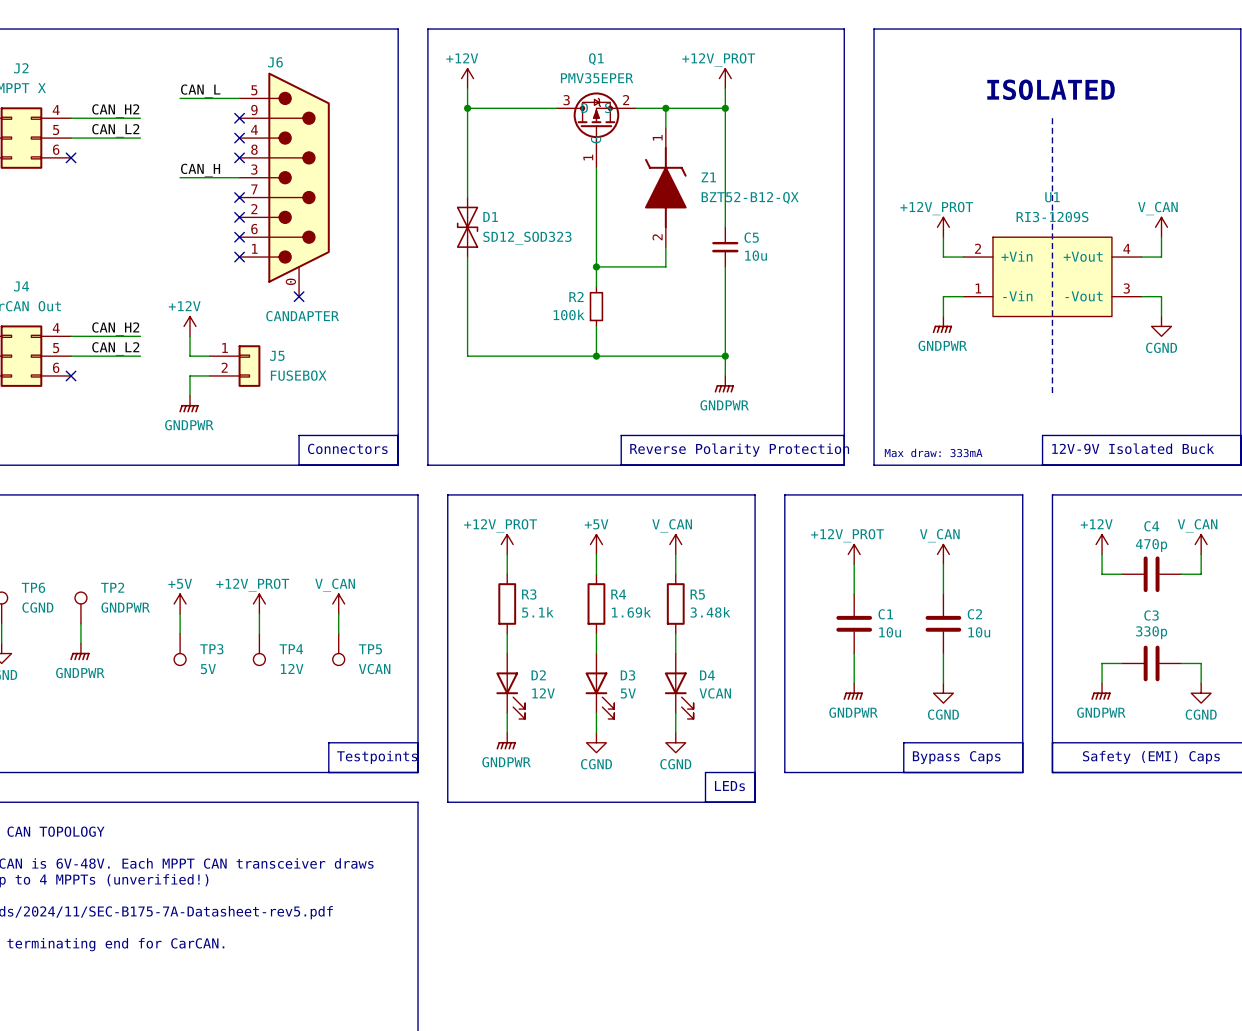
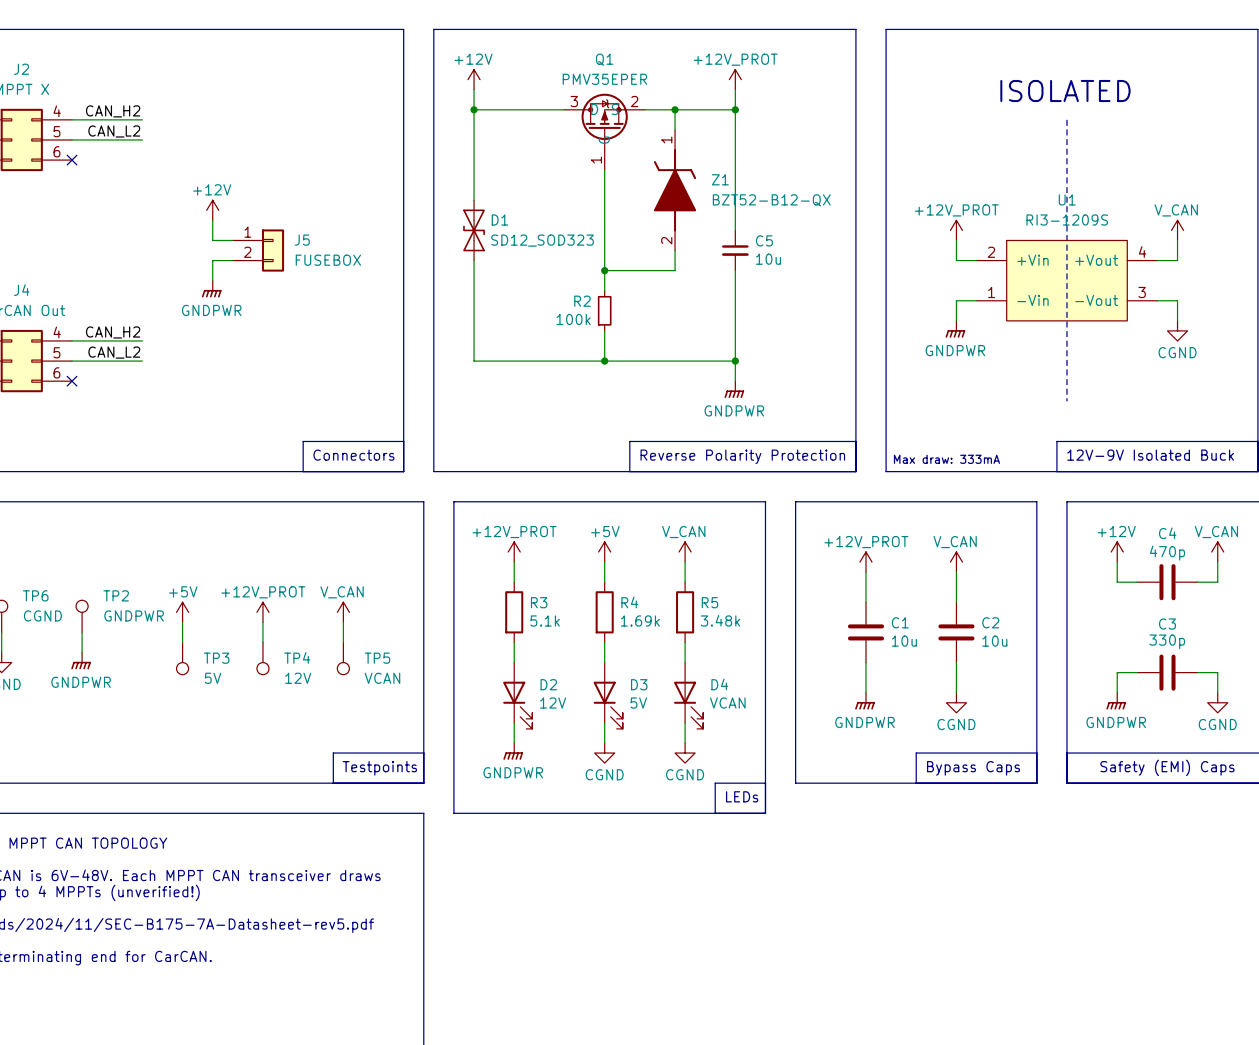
label: CAN_L (200, 91) -> none
wire: (180, 98) (239, 98) -> none
no-connect mark: (239, 118) -> none
no-connect mark: (239, 138) -> none
no-connect mark: (239, 157) -> none
label: CAN_H (200, 170) -> none
wire: (180, 177) (239, 177) -> none
J6: CANDAPTER (284, 184) -> none
no-connect mark: (239, 197) -> none
no-connect mark: (239, 217) -> none
no-connect mark: (239, 237) -> none
no-connect mark: (239, 257) -> none
no-connect mark: (299, 296) -> none
power symbol position: +12V (190, 326) -> +12V (212, 210)
wire: (190, 336) (190, 356) (209, 356) -> (212, 220) (212, 240) (232, 240)
J5 position: (235, 366) -> (258, 250)
wire: (209, 375) (190, 375) (190, 395) -> (232, 260) (212, 260) (212, 280)
power symbol position: GNDPWR (189, 404) -> GNDPWR (211, 289)

